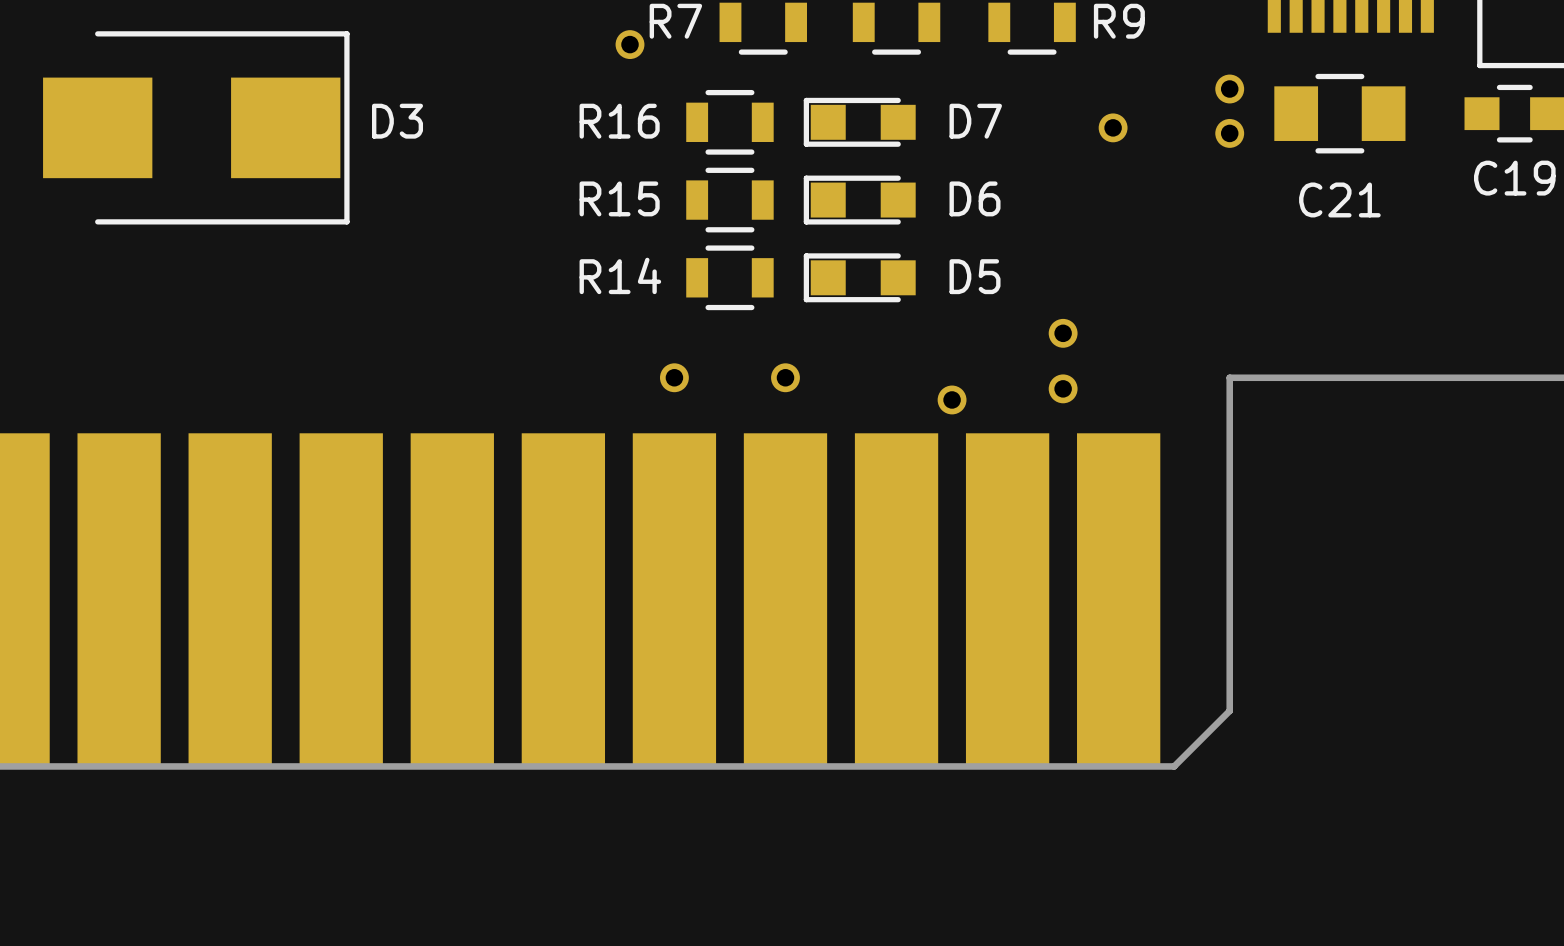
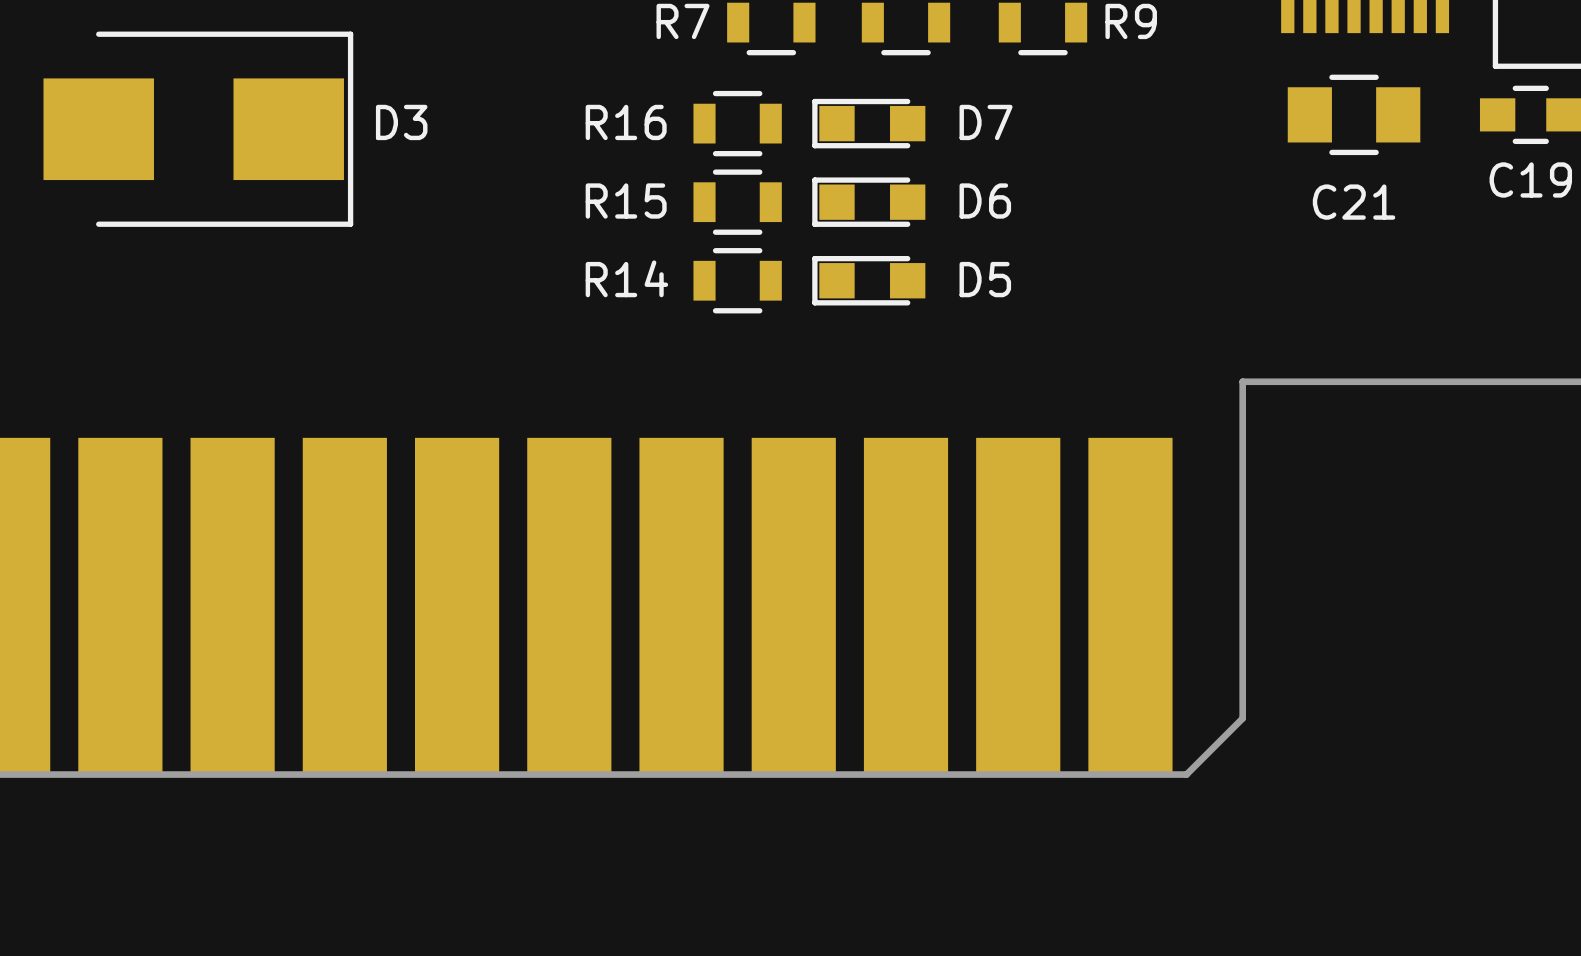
part: (630, 44) -> none
part: (1229, 89) -> none
part: (1113, 127) -> none
part: (1229, 133) -> none
part: (1063, 333) -> none
part: (674, 377) -> none
part: (785, 377) -> none
part: (1063, 388) -> none
part: (952, 399) -> none

